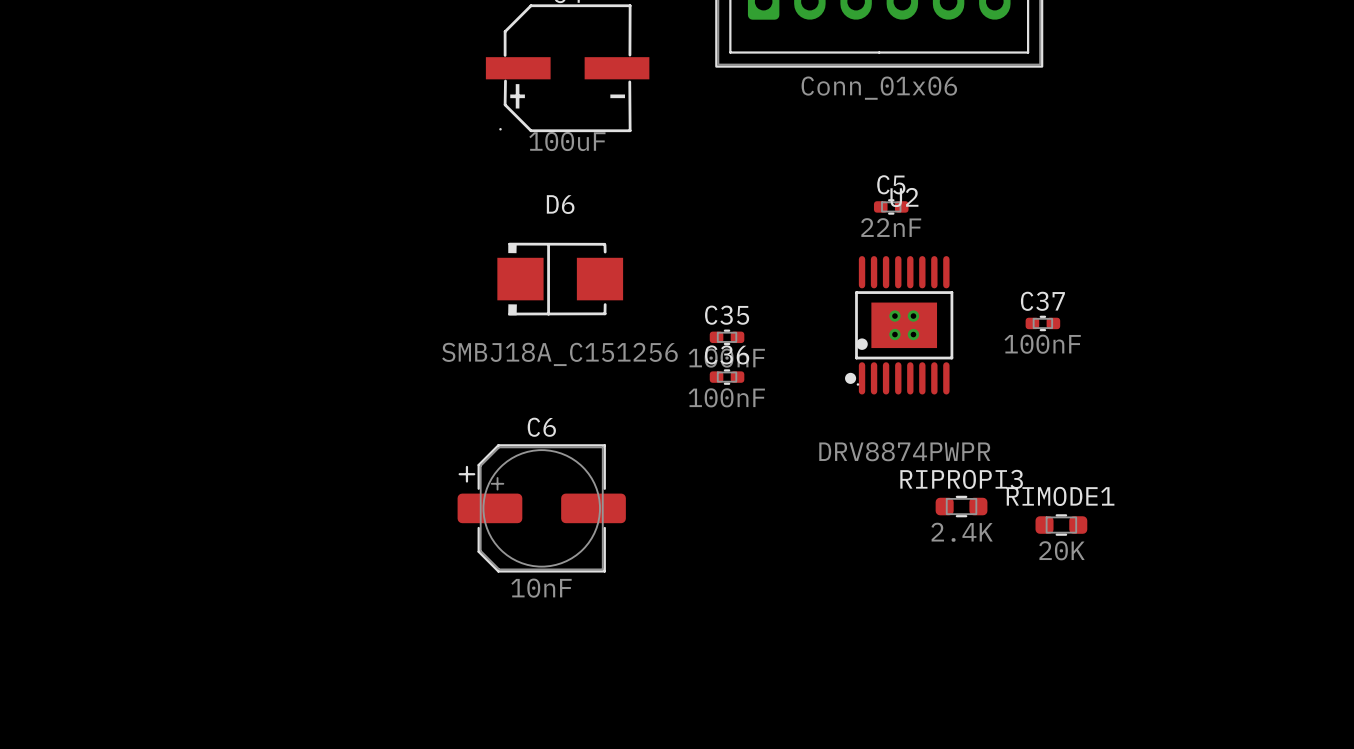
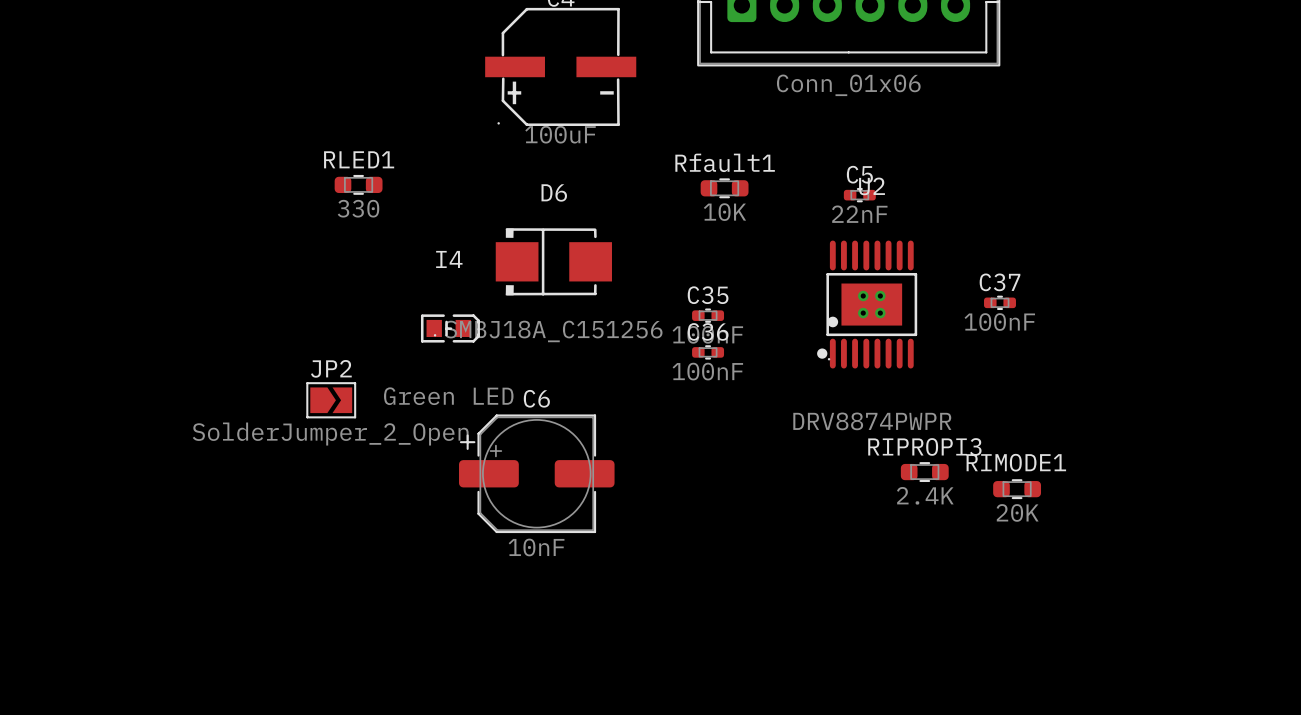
RLED1: none -> 330 (358, 184)
Rfault1: none -> 10K (724, 188)
I4: none -> Green LED (450, 328)
JP2: none -> SolderJumper_2_Open (331, 400)

